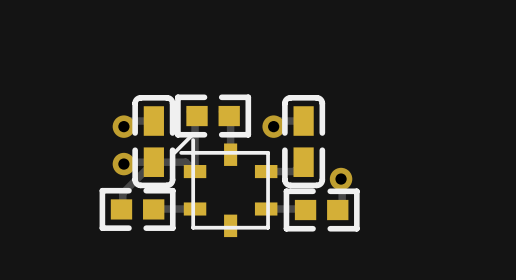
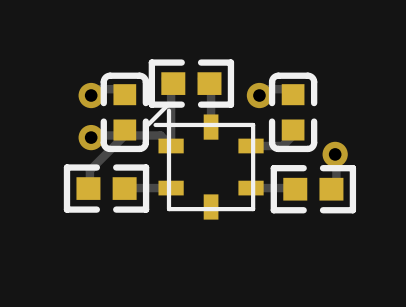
part footprint: [132, 94, 176, 189] -> [100, 72, 150, 153]
part footprint: [282, 94, 326, 189] -> [268, 72, 318, 153]

